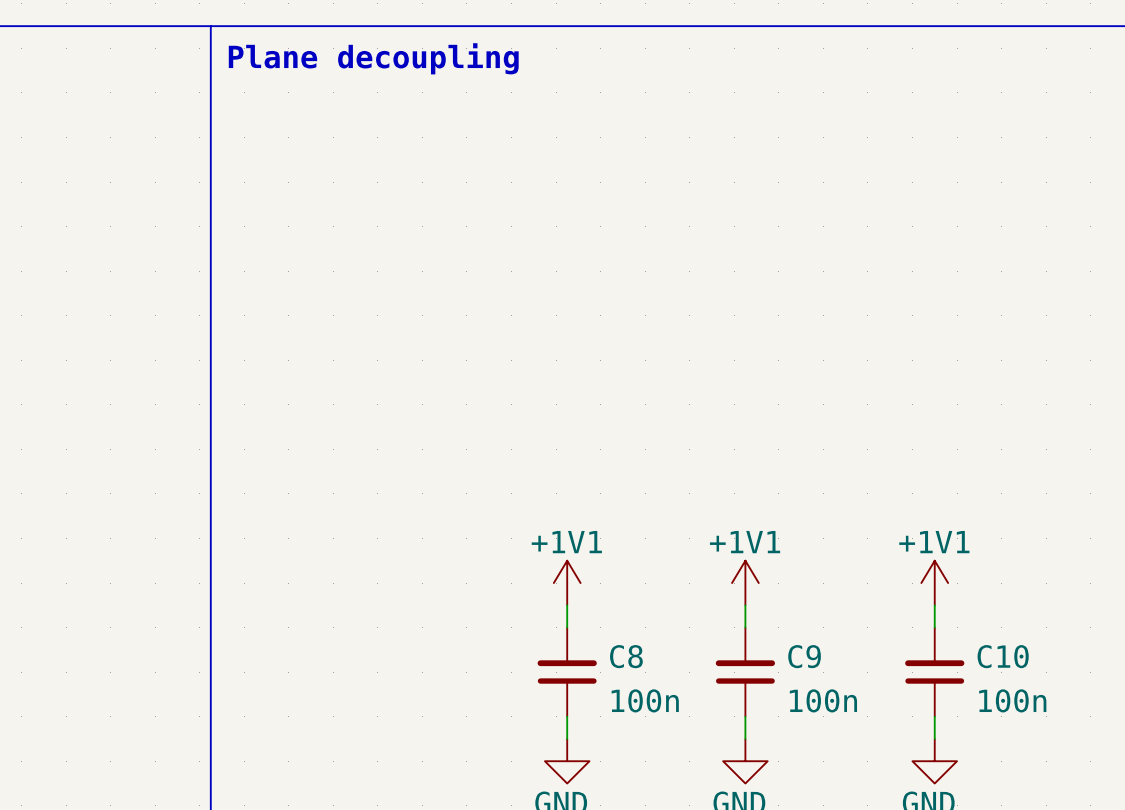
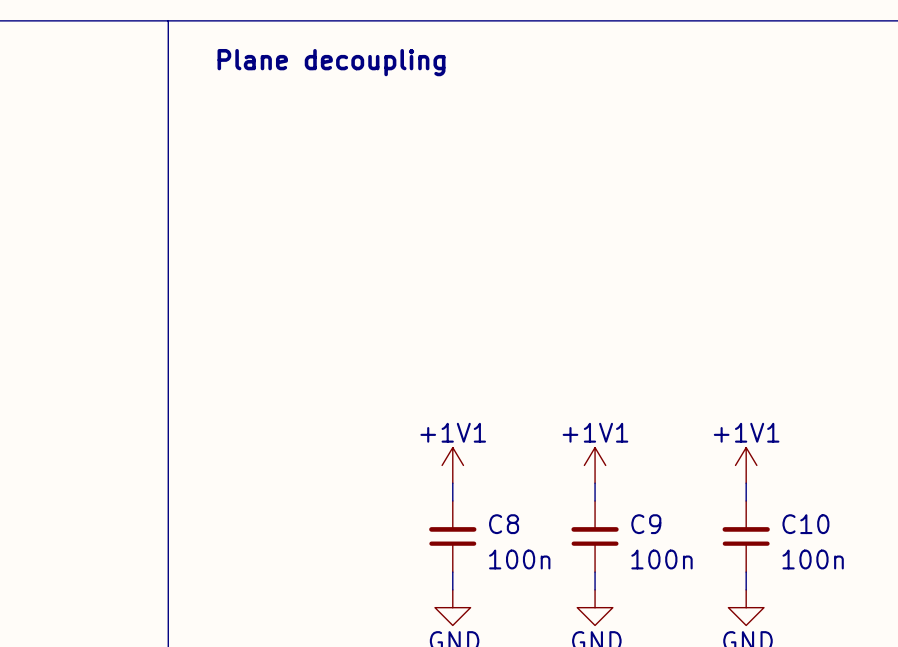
text position: Plane decoupling (373, 58) -> Plane decoupling (331, 62)

